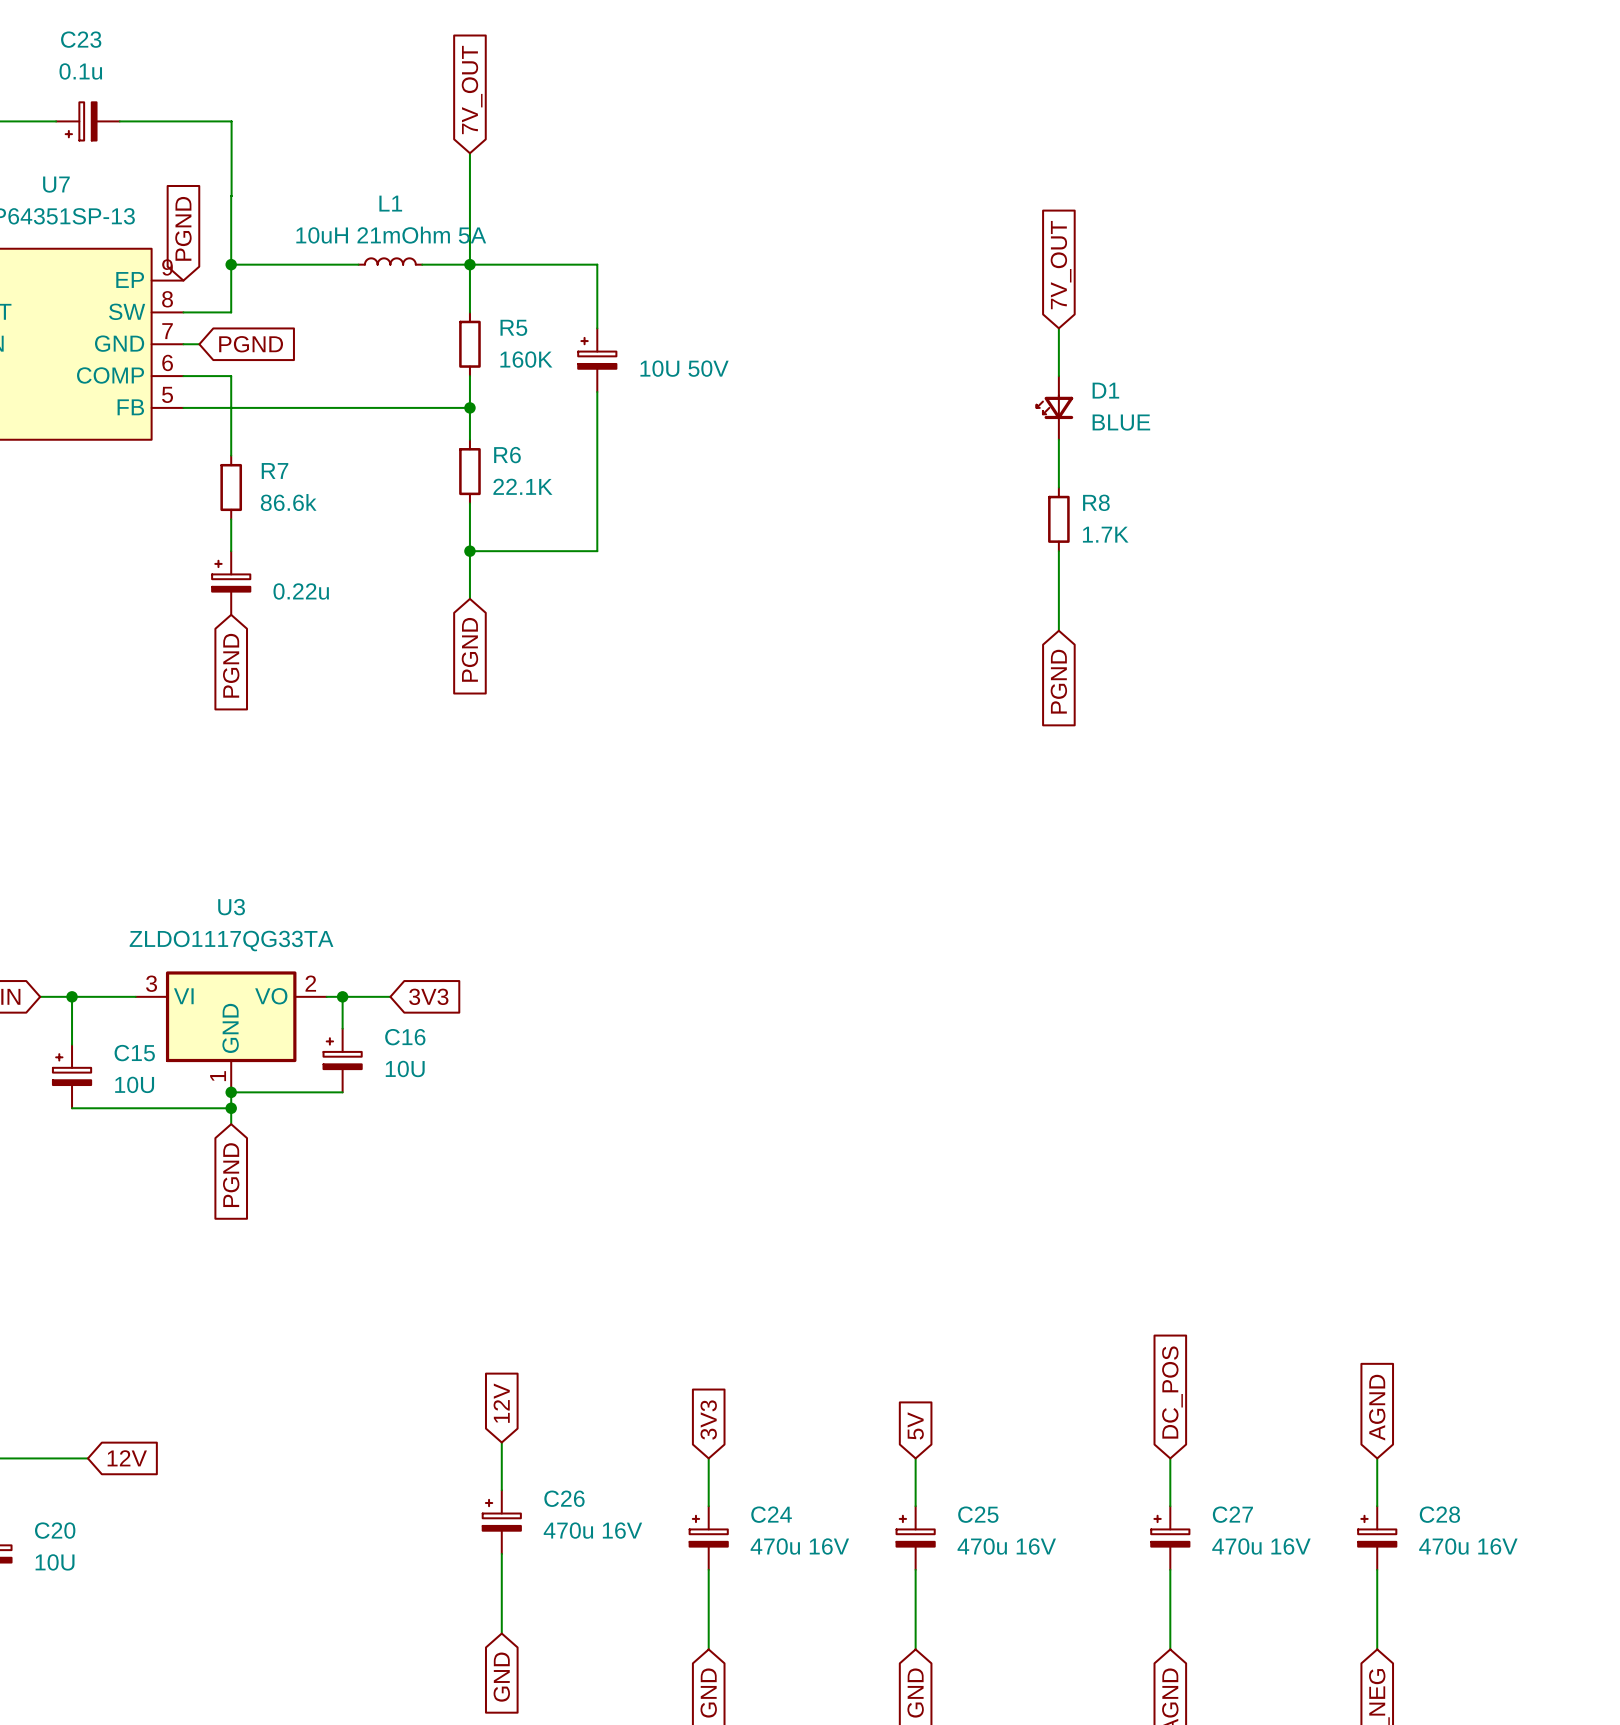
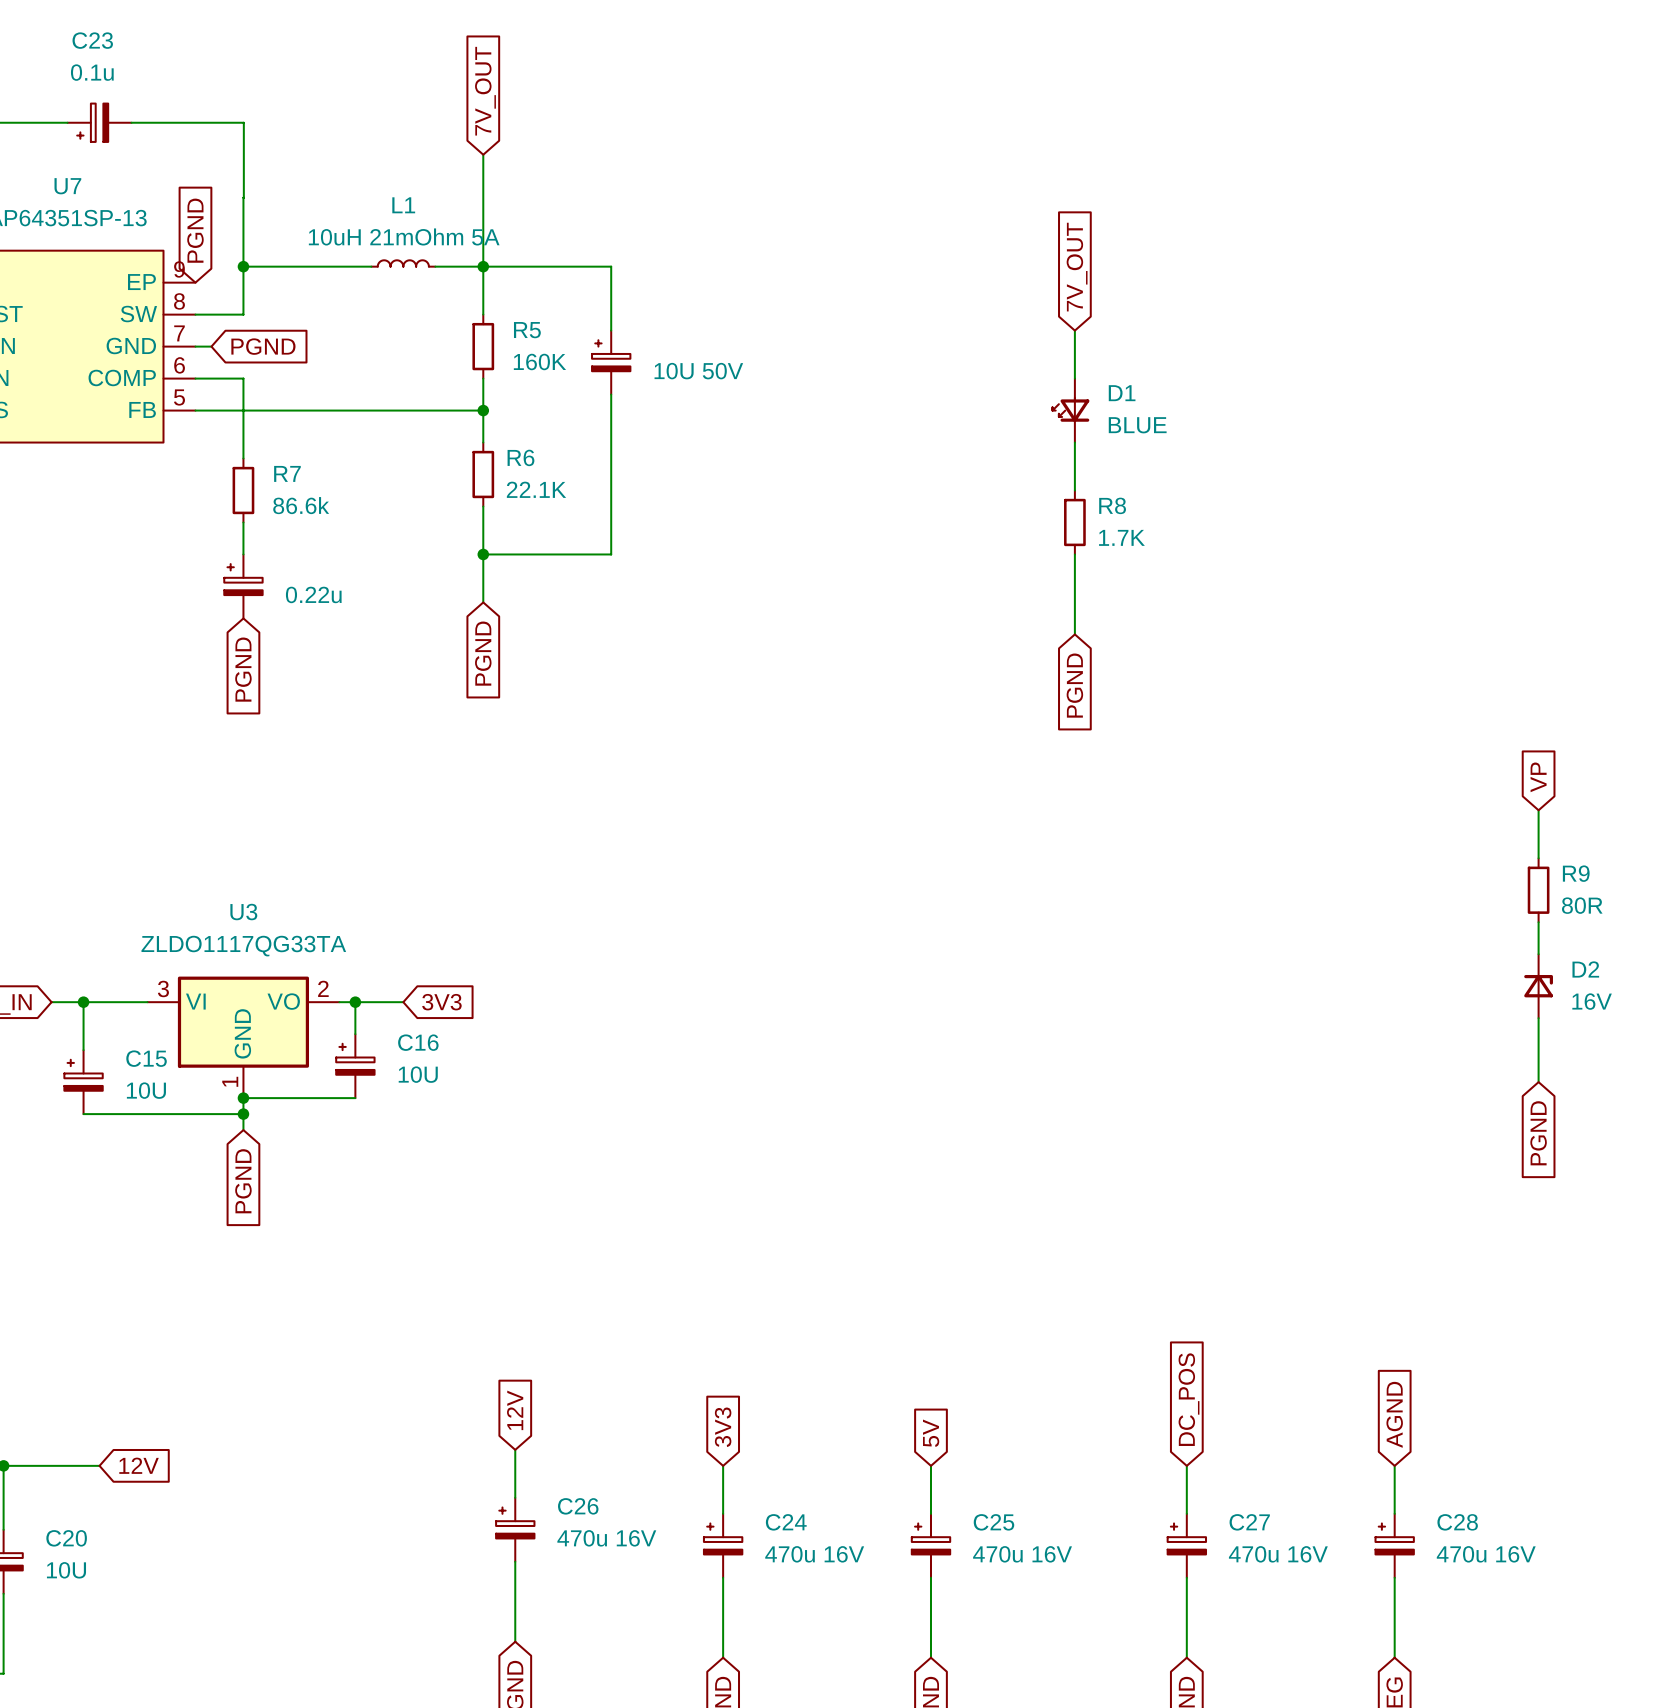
global label: none -> VP (1538, 777)
wire: none -> (1538, 810) (1538, 858)
R9: none -> 80R (1538, 890)
wire: none -> (1538, 922) (1538, 954)
D2: none -> 16V (1538, 986)
wire: none -> (1538, 1018) (1538, 1082)
global label: none -> PGND (1538, 1133)

